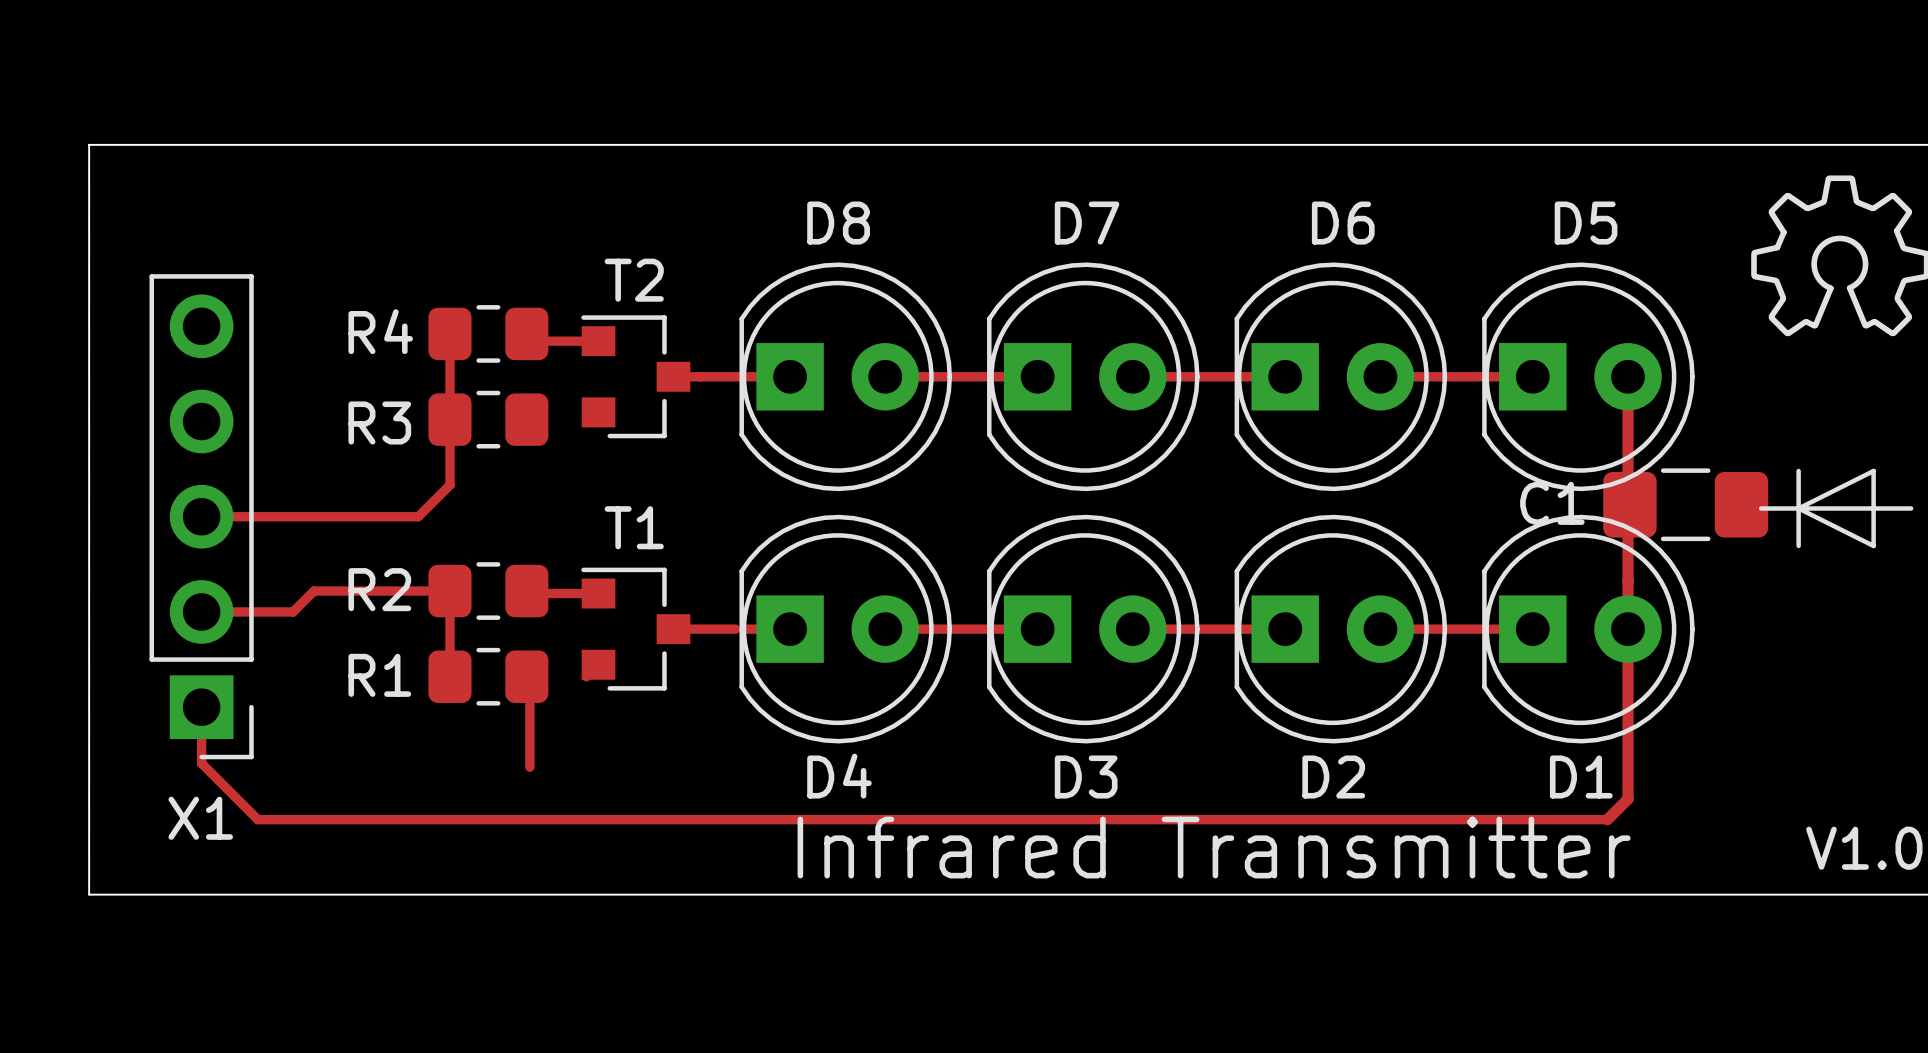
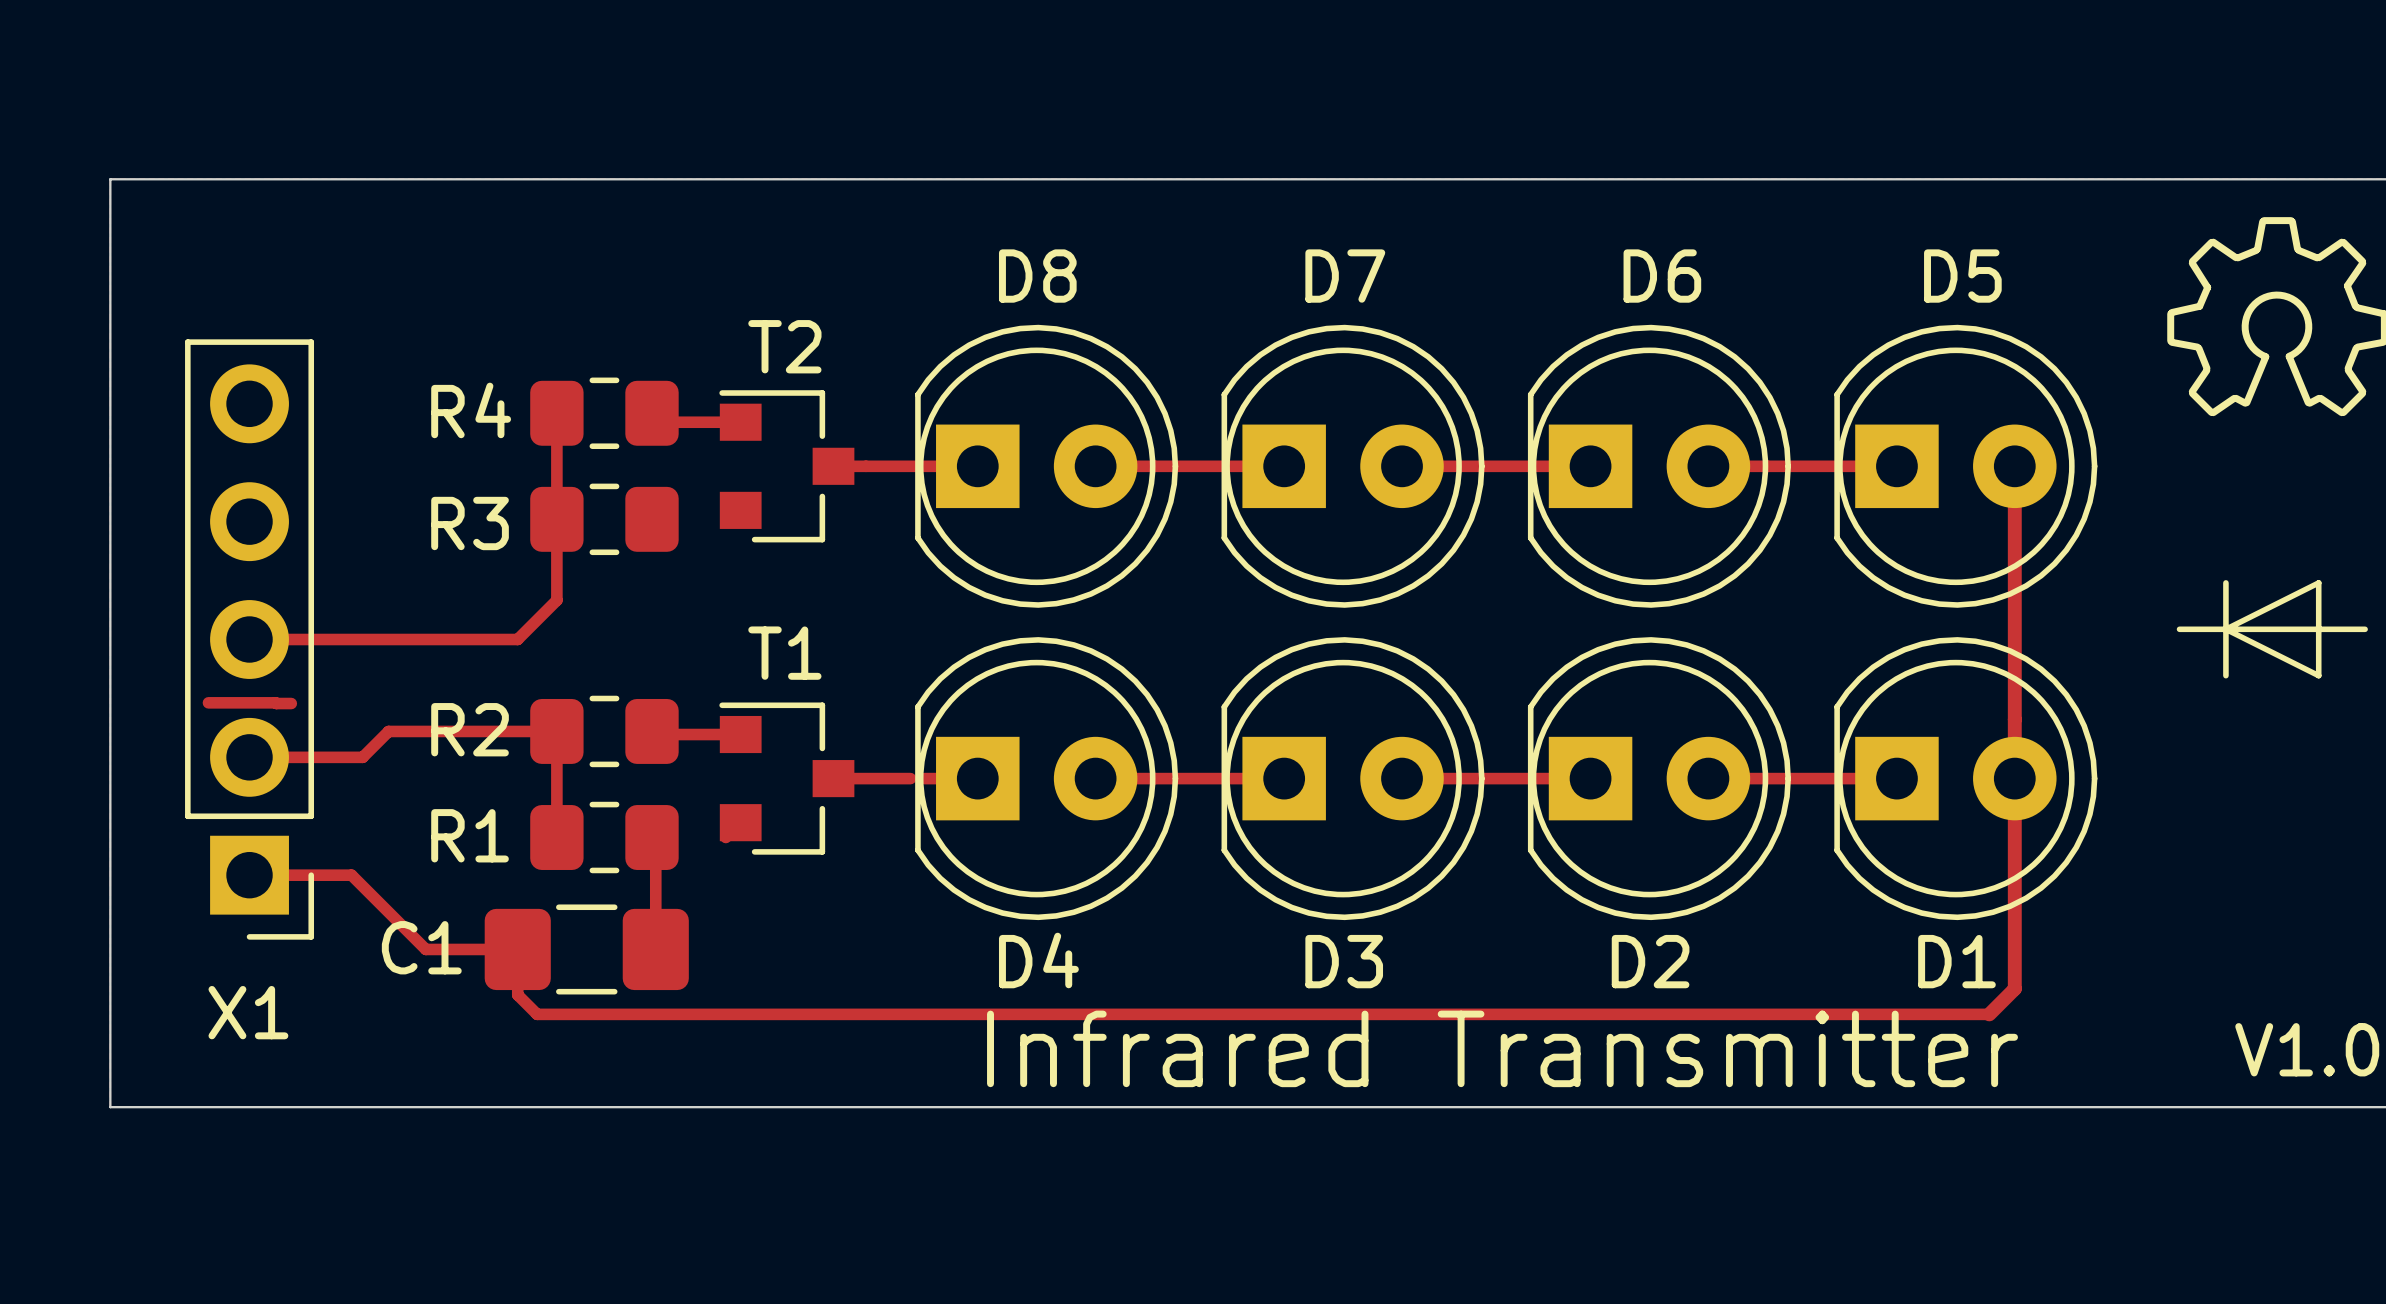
C1 position: (1685, 504) -> (586, 949)
top track: none -> (208, 702) (291, 703)
top track: (201, 707) (201, 763) (257, 819) (434, 819) -> (249, 875) (351, 875) (425, 949) (517, 949) (517, 994) (537, 1014)

